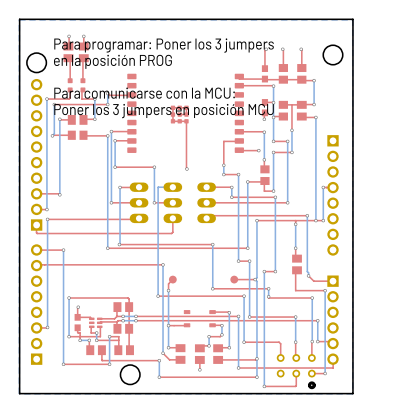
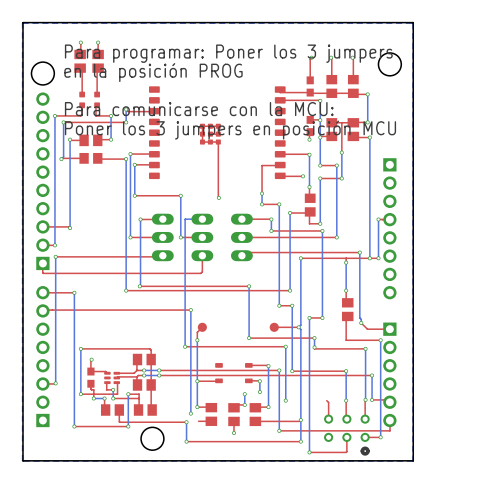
top track: (221, 334) (220, 336) (209, 336) -> none
top track: (279, 342) (244, 342) -> none
top track: (163, 353) (169, 359) -> none

